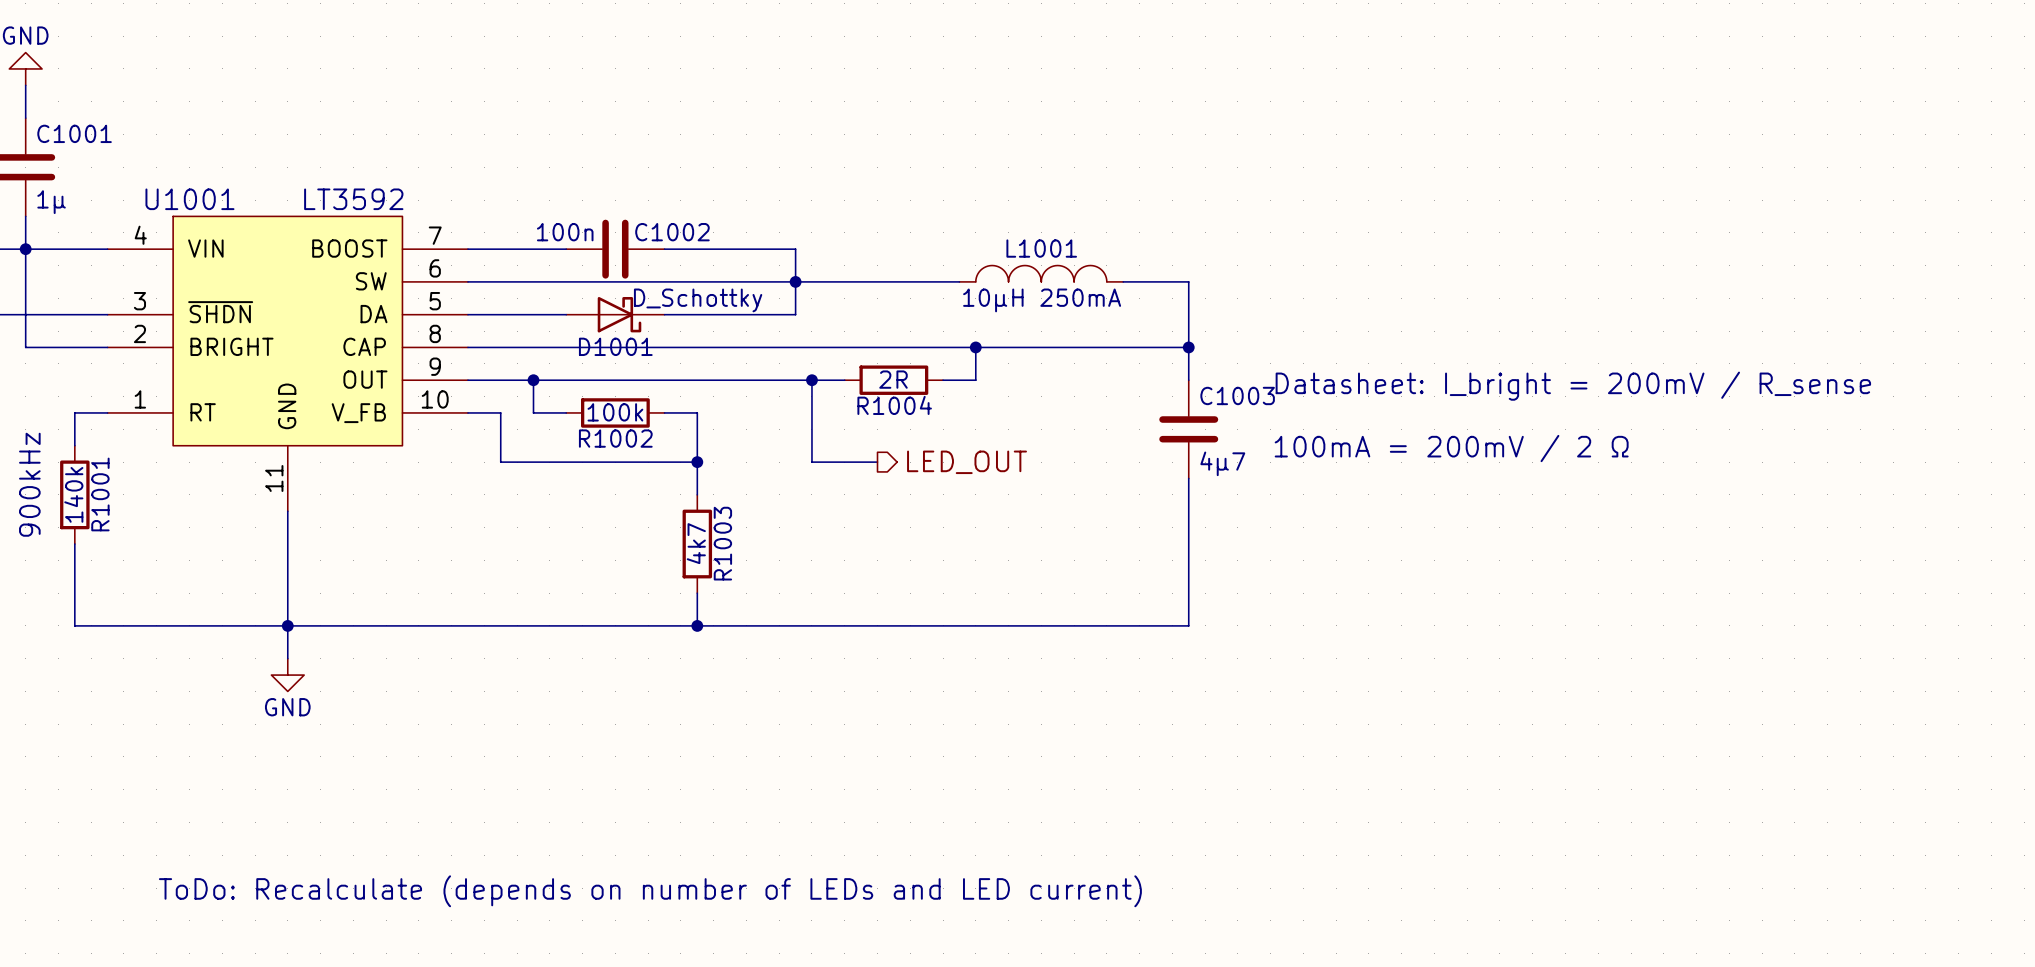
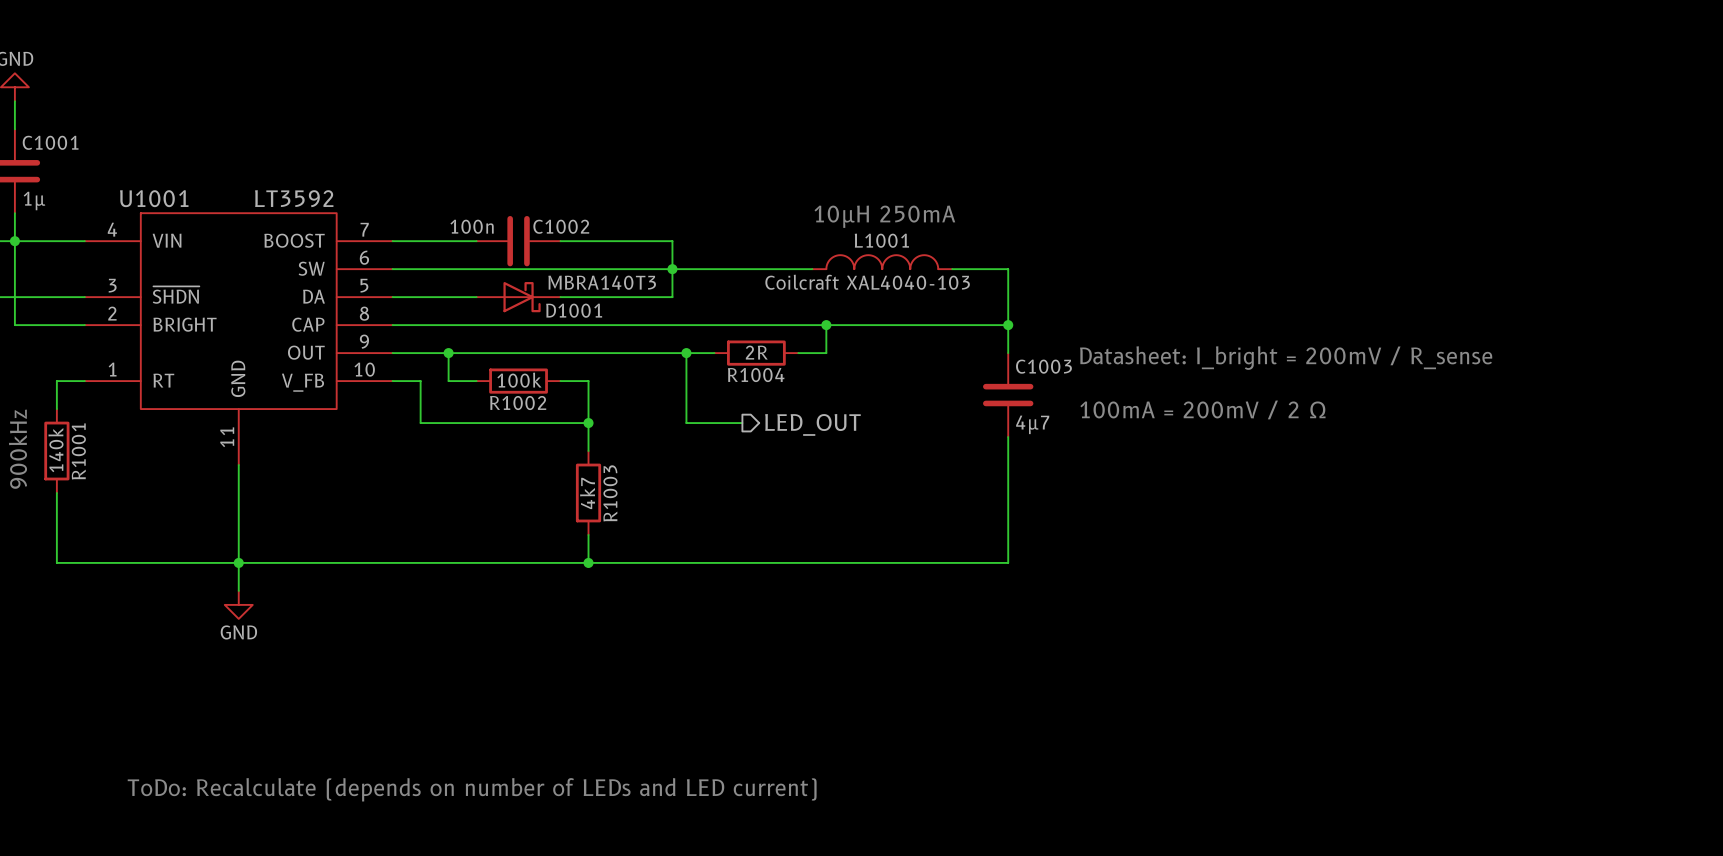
text: none -> 10µH 250mA (884, 216)
D1001 value: D_Schottky (698, 300) -> MBRA140T3 (602, 282)
L1001 value: 10µH 250mA (1042, 300) -> Coilcraft XAL4040-103 (867, 282)
D1001 name position: D1001 (615, 346) -> D1001 (574, 310)

